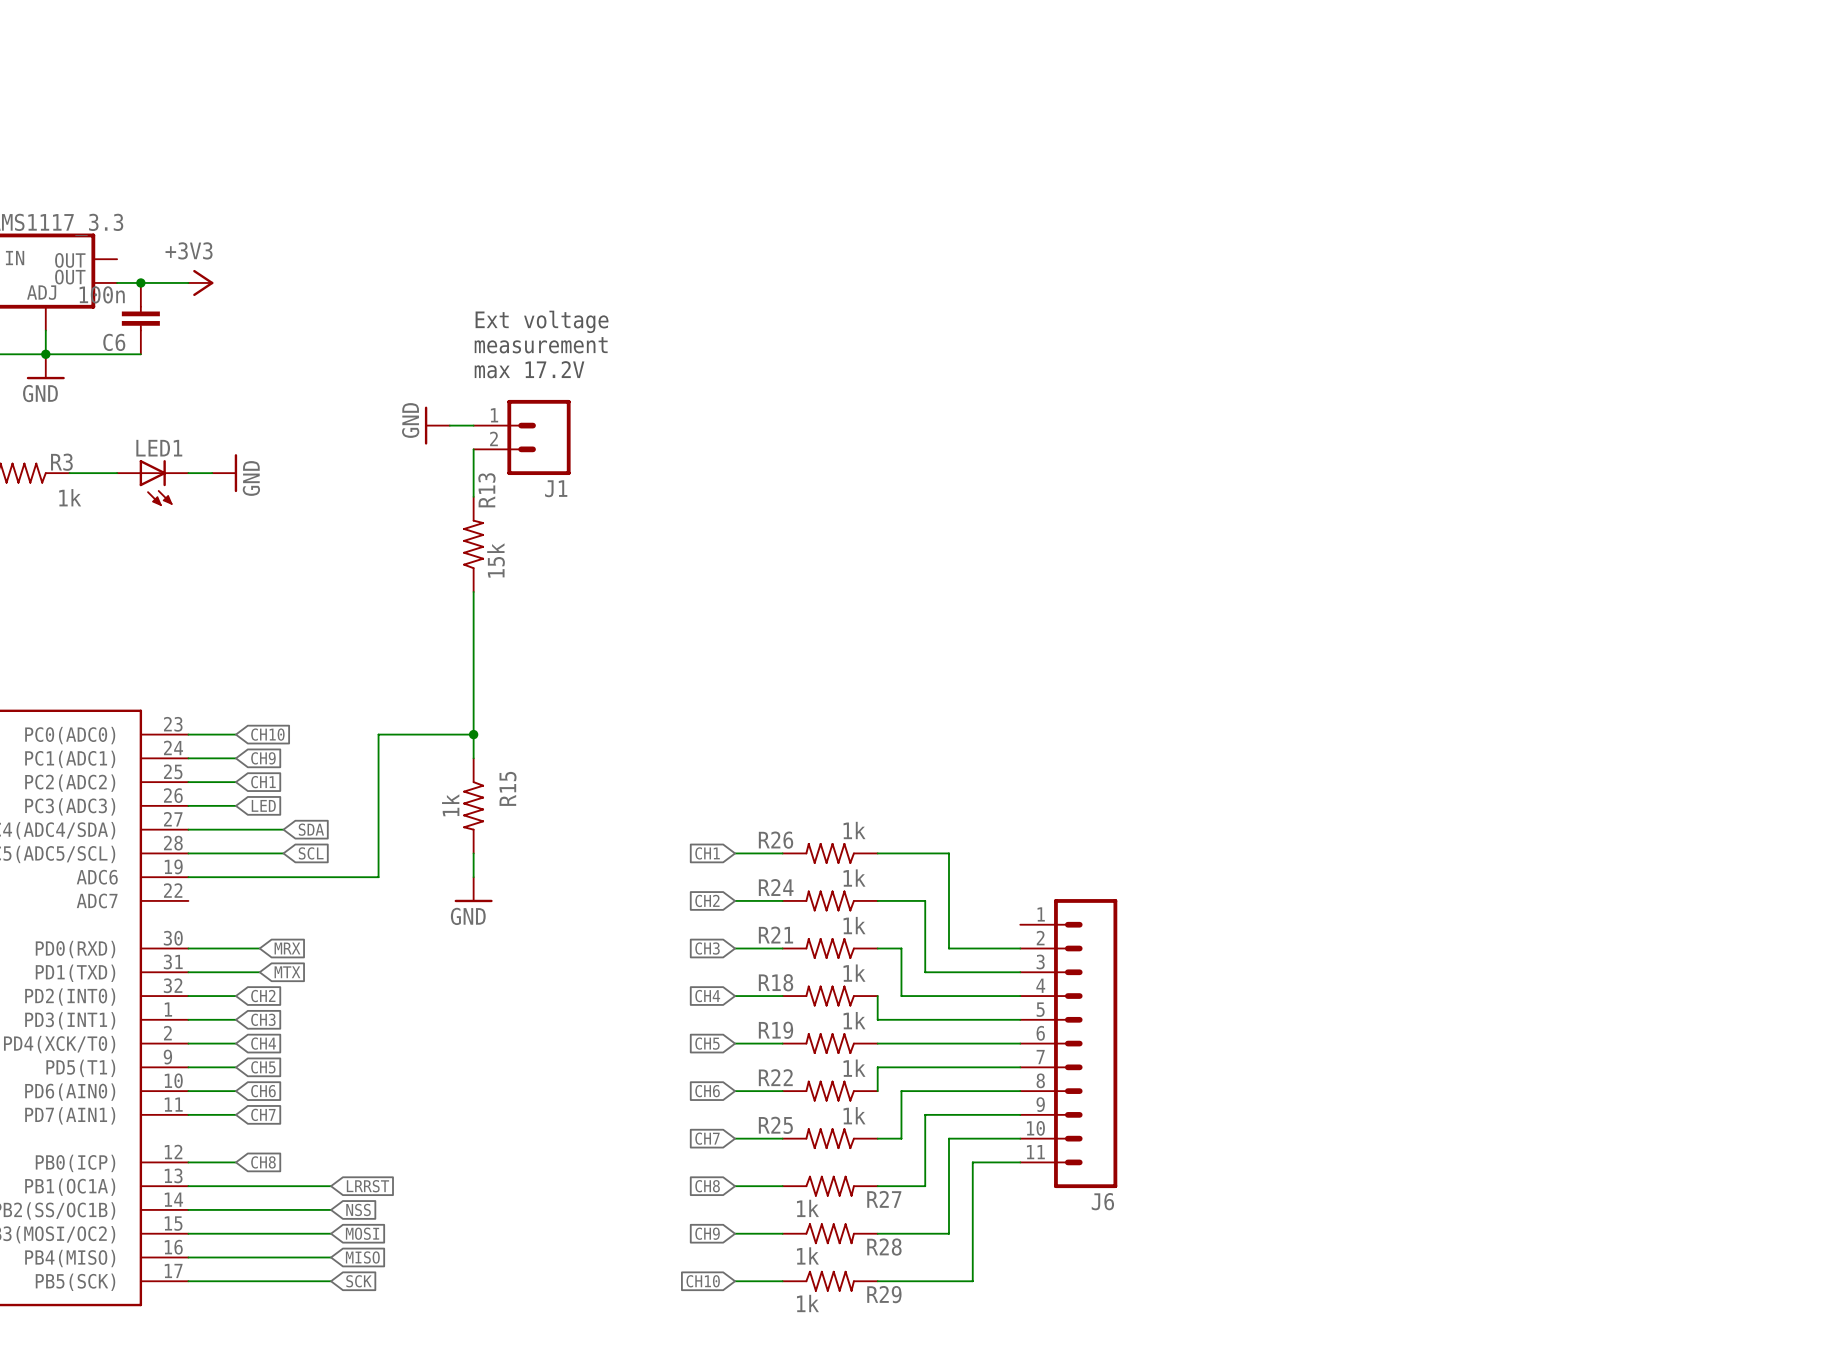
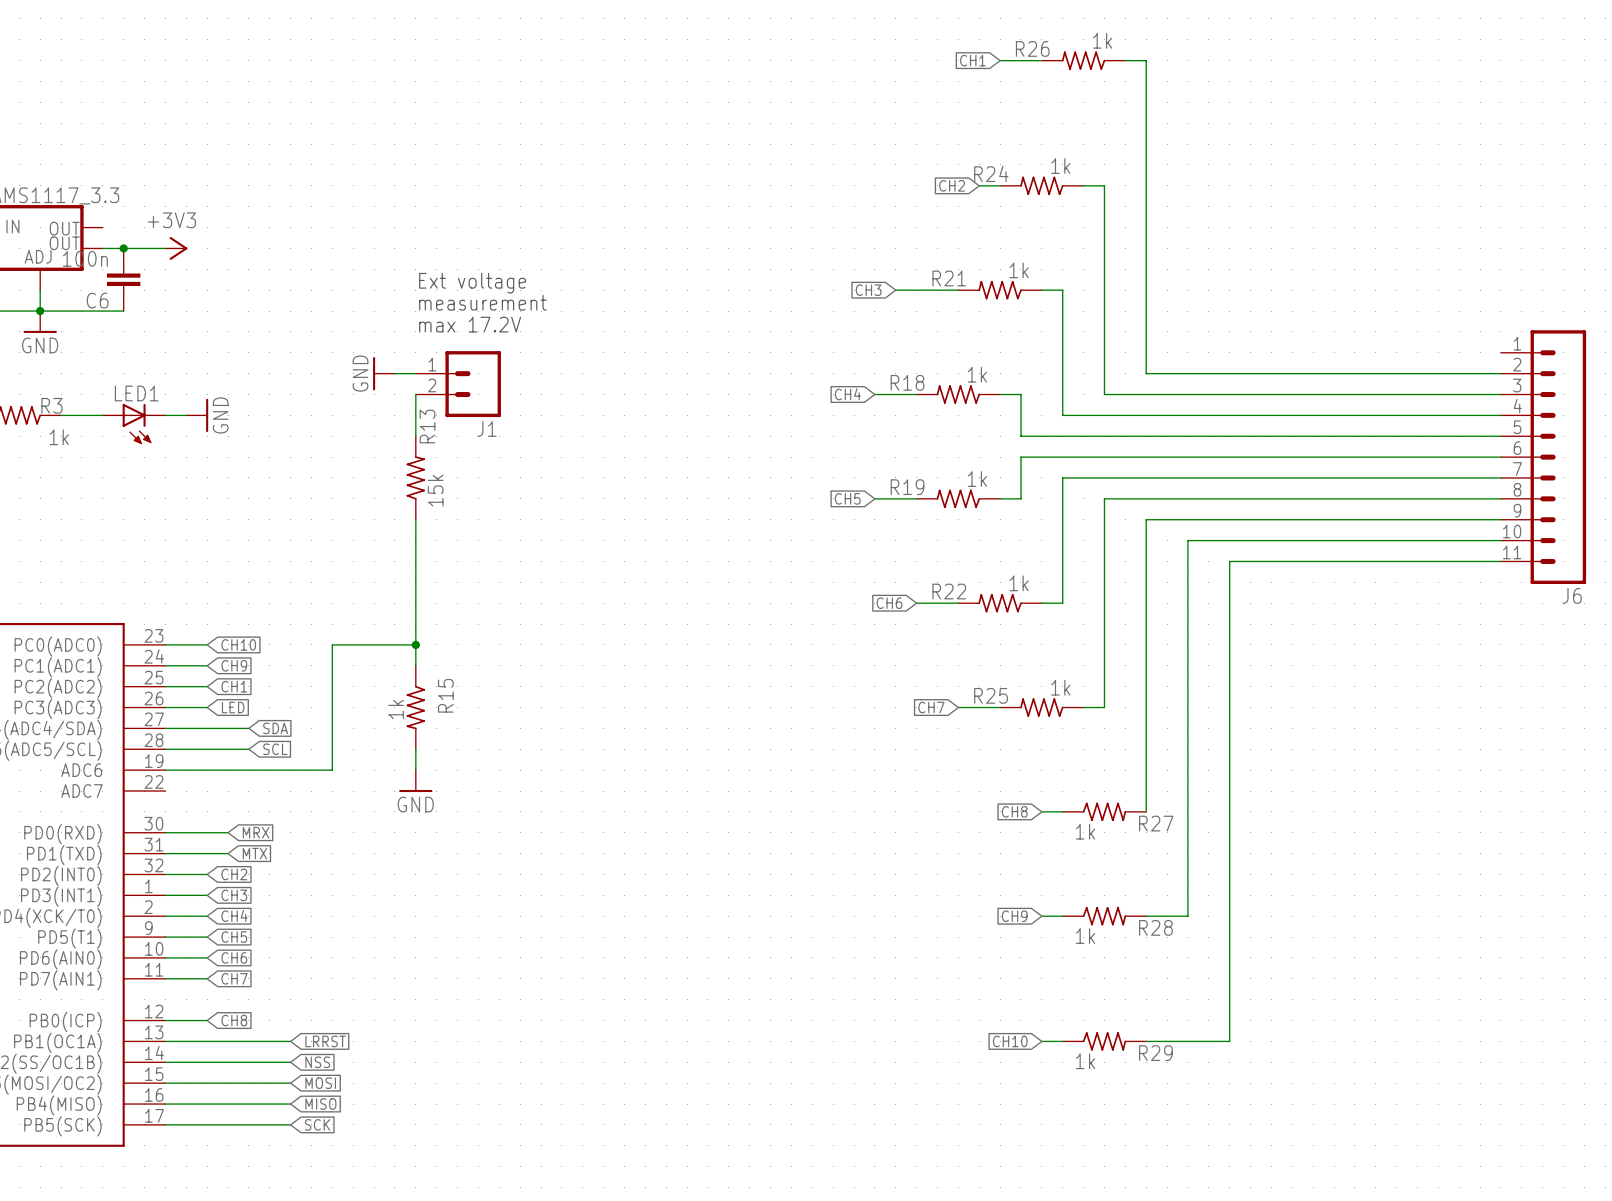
global label: none -> CH1 (972, 60)
wire: none -> (1000, 60) (1041, 60)
wire: none -> (1125, 60) (1146, 60) (1146, 373) (1500, 373)
global label: none -> CH2 (952, 185)
wire: none -> (979, 185) (1000, 185)
wire: none -> (1083, 185) (1104, 185) (1104, 394) (1500, 394)
global label: none -> CH3 (868, 290)
wire: none -> (895, 290) (958, 290)
wire: none -> (1041, 290) (1062, 290) (1062, 415) (1500, 415)
global label: none -> CH4 (847, 394)
wire: none -> (874, 394) (916, 394)
wire: none -> (1000, 394) (1020, 394) (1020, 436) (1500, 436)
wire: none -> (1500, 457) (1020, 457) (1020, 498) (1000, 498)
wire: none -> (1500, 477) (1062, 477) (1062, 603) (1041, 603)
global label: none -> CH5 (847, 498)
wire: none -> (874, 498) (916, 498)
wire: none -> (1500, 498) (1104, 498) (1104, 707) (1083, 707)
wire: none -> (1500, 519) (1146, 519) (1146, 811)
wire: none -> (1500, 540) (1187, 540) (1187, 916) (1146, 916)
wire: none -> (1500, 561) (1229, 561) (1229, 1041) (1146, 1041)
global label: none -> CH6 (889, 603)
wire: none -> (916, 603) (958, 603)
global label: none -> CH7 (931, 707)
wire: none -> (958, 707) (1000, 707)
global label: CH1 (707, 853) -> none
wire: (735, 853) (782, 853) -> none
R26 position: (830, 853) -> (1083, 60)
wire: (877, 853) (949, 853) (949, 948) (1020, 948) -> none
global label: CH2 (707, 900) -> none
wire: (735, 900) (782, 900) -> none
R24 position: (830, 900) -> (1041, 185)
wire: (877, 900) (925, 900) (925, 972) (1020, 972) -> none
global label: none -> CH8 (1014, 811)
wire: none -> (1041, 811) (1062, 811)
global label: CH3 (707, 948) -> none
wire: (735, 948) (782, 948) -> none
R21 position: (830, 948) -> (1000, 290)
wire: (877, 948) (901, 948) (901, 996) (1020, 996) -> none
global label: CH4 (707, 996) -> none
wire: (735, 996) (782, 996) -> none
R18 position: (830, 996) -> (958, 394)
wire: (877, 996) (877, 1019) (1020, 1019) -> none
global label: CH5 (707, 1043) -> none
wire: (735, 1043) (782, 1043) -> none
R19 position: (830, 1043) -> (958, 498)
wire: (877, 1043) (1020, 1043) -> none
J6 position: (1068, 1043) -> (1543, 457)
global label: none -> CH9 (1014, 916)
wire: none -> (1041, 916) (1062, 916)
wire: (1020, 1067) (877, 1067) (877, 1091) -> none
global label: CH6 (707, 1091) -> none
wire: (735, 1091) (782, 1091) -> none
R22 position: (830, 1091) -> (1000, 603)
wire: (1020, 1091) (901, 1091) (901, 1138) (877, 1138) -> none
wire: (1020, 1114) (925, 1114) (925, 1186) (877, 1186) -> none
global label: CH7 (707, 1138) -> none
wire: (735, 1138) (782, 1138) -> none
R25 position: (830, 1138) -> (1041, 707)
wire: (1020, 1138) (949, 1138) (949, 1233) (877, 1233) -> none
wire: (1020, 1162) (972, 1162) (972, 1281) (877, 1281) -> none
global label: CH8 (707, 1186) -> none
wire: (735, 1186) (782, 1186) -> none
R27 position: (830, 1186) -> (1104, 811)
global label: none -> CH10 (1010, 1041)
wire: none -> (1041, 1041) (1062, 1041)
global label: CH9 (707, 1233) -> none
wire: (735, 1233) (782, 1233) -> none
R28 position: (830, 1233) -> (1104, 916)
global label: CH10 (703, 1281) -> none
wire: (735, 1281) (782, 1281) -> none
R29 position: (830, 1281) -> (1104, 1041)

